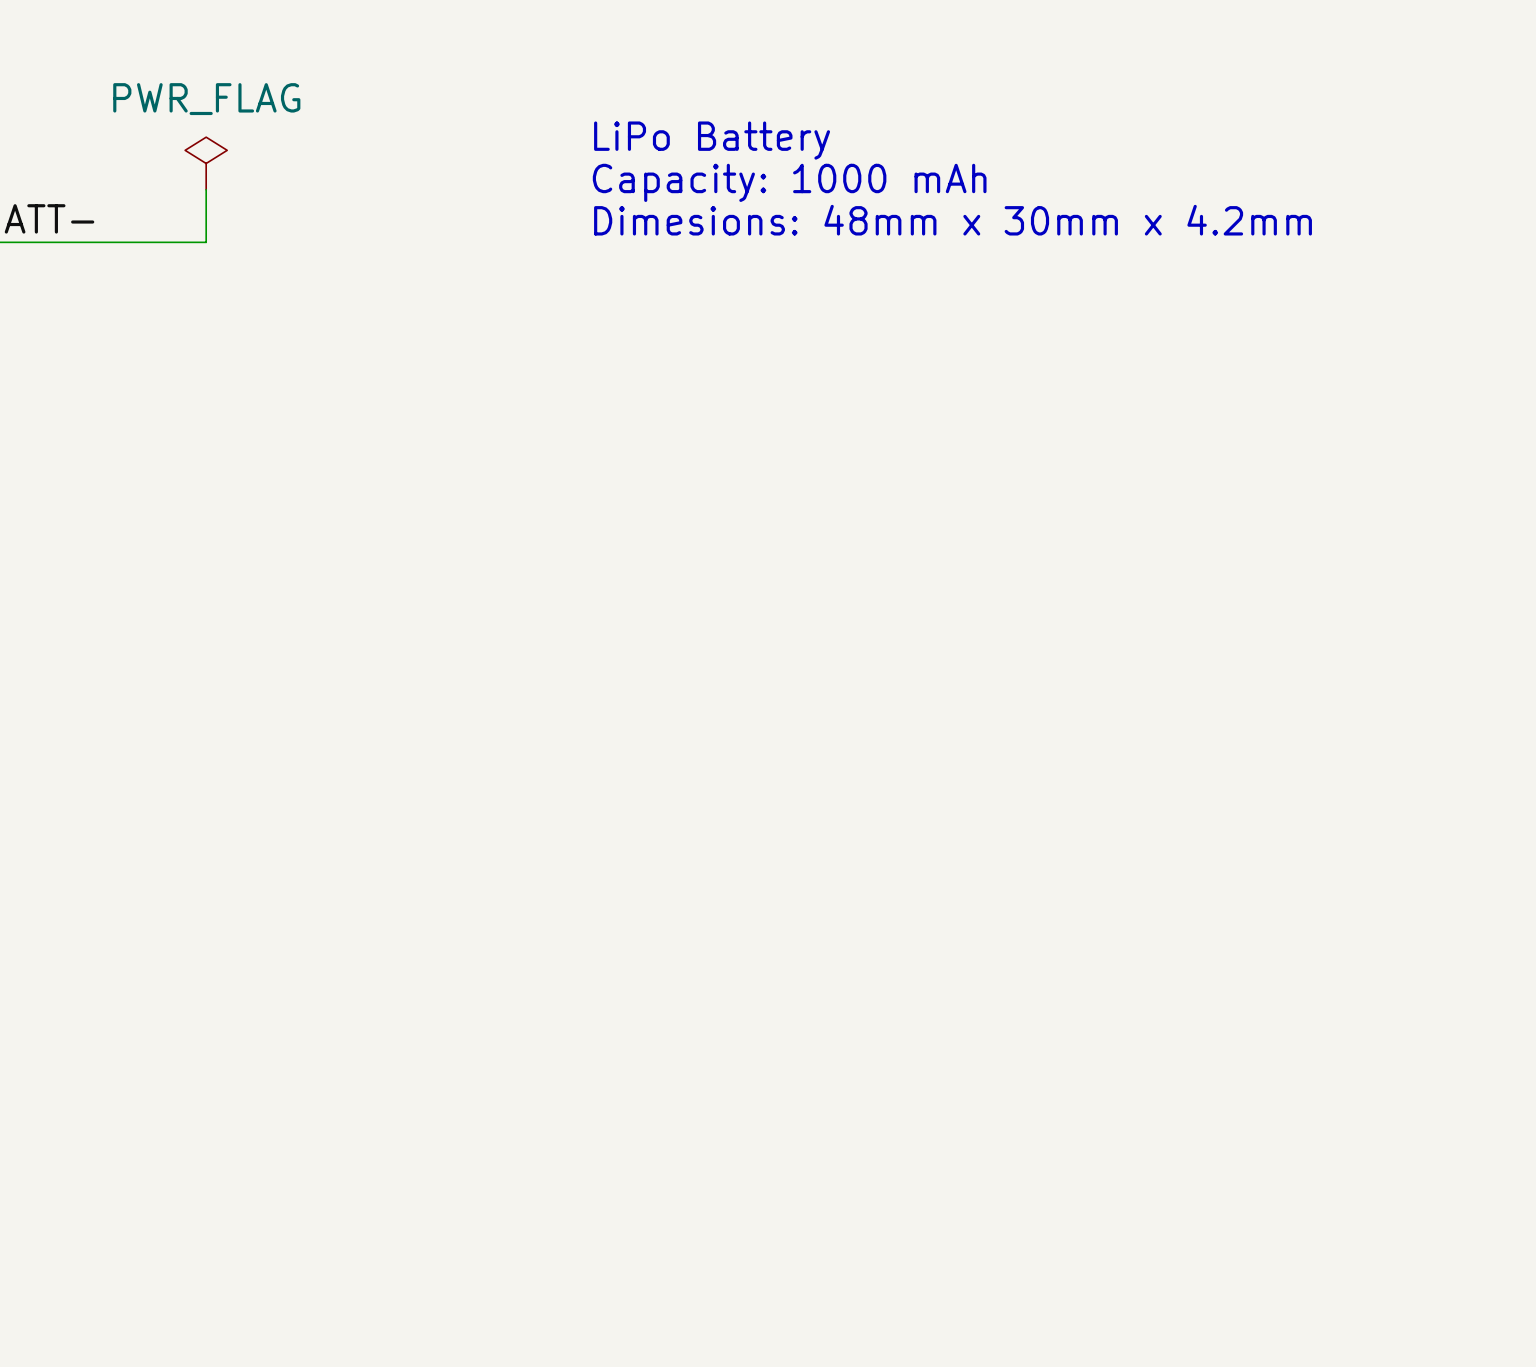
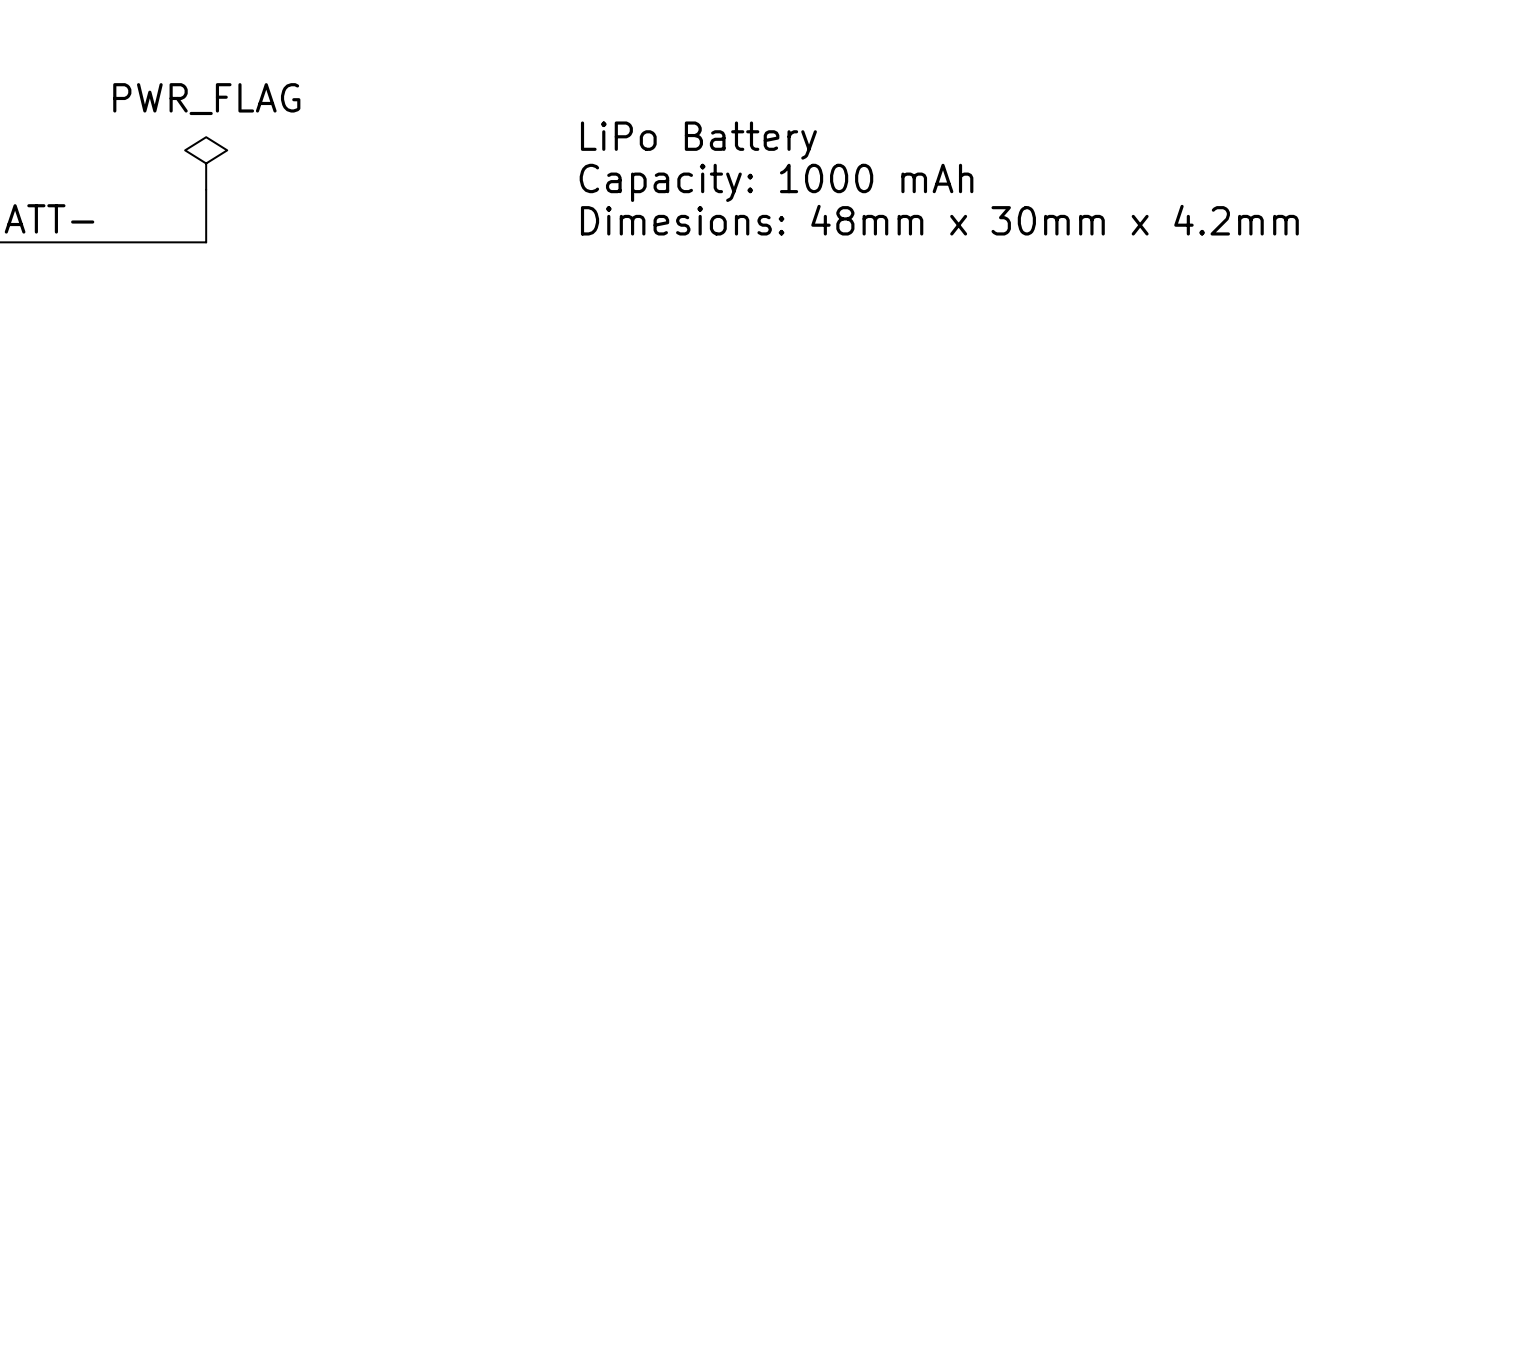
text position: LiPo Battery (712, 140) -> LiPo Battery (698, 140)
text position: Capacity: 1000 mAh (789, 182) -> Capacity: 1000 mAh (776, 182)
text position: Dimesions: 48mm x 30mm x 4.2mm (953, 220) -> Dimesions: 48mm x 30mm x 4.2mm (939, 220)

